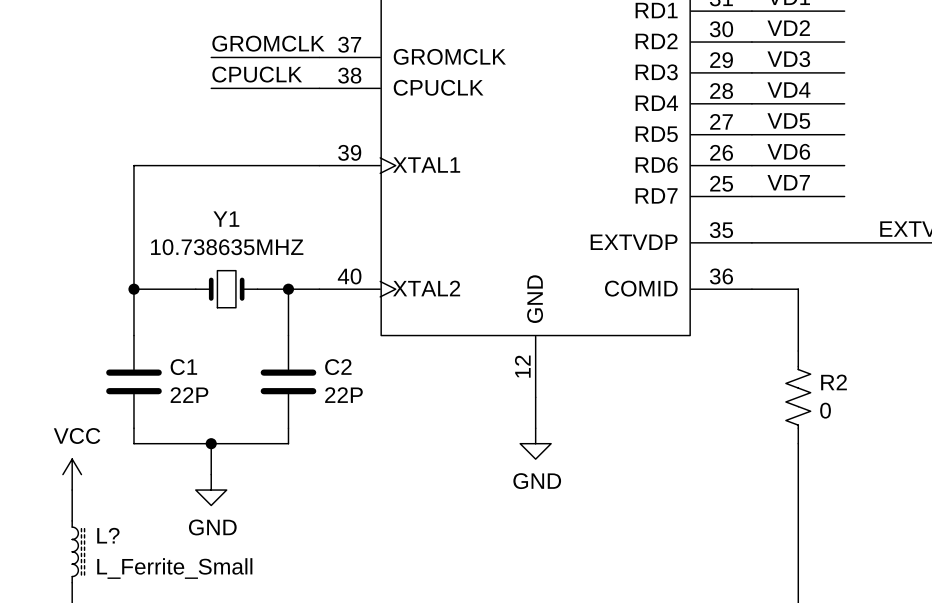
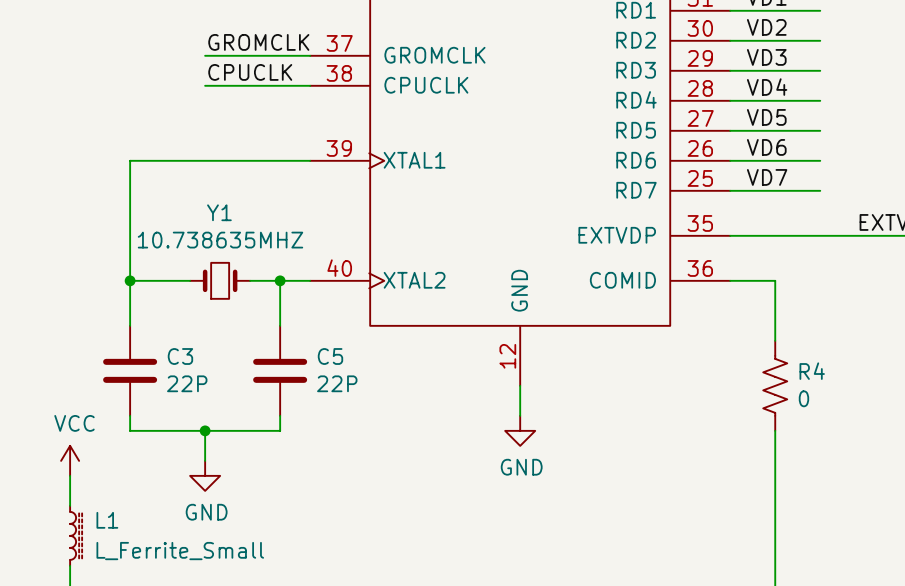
C1 name: C1 (183, 367) -> C3 (180, 356)
C2 name: C2 (338, 367) -> C5 (330, 356)
R2 name: R2 (834, 382) -> R4 (812, 371)
L? name: L? (108, 535) -> L1 (107, 520)

